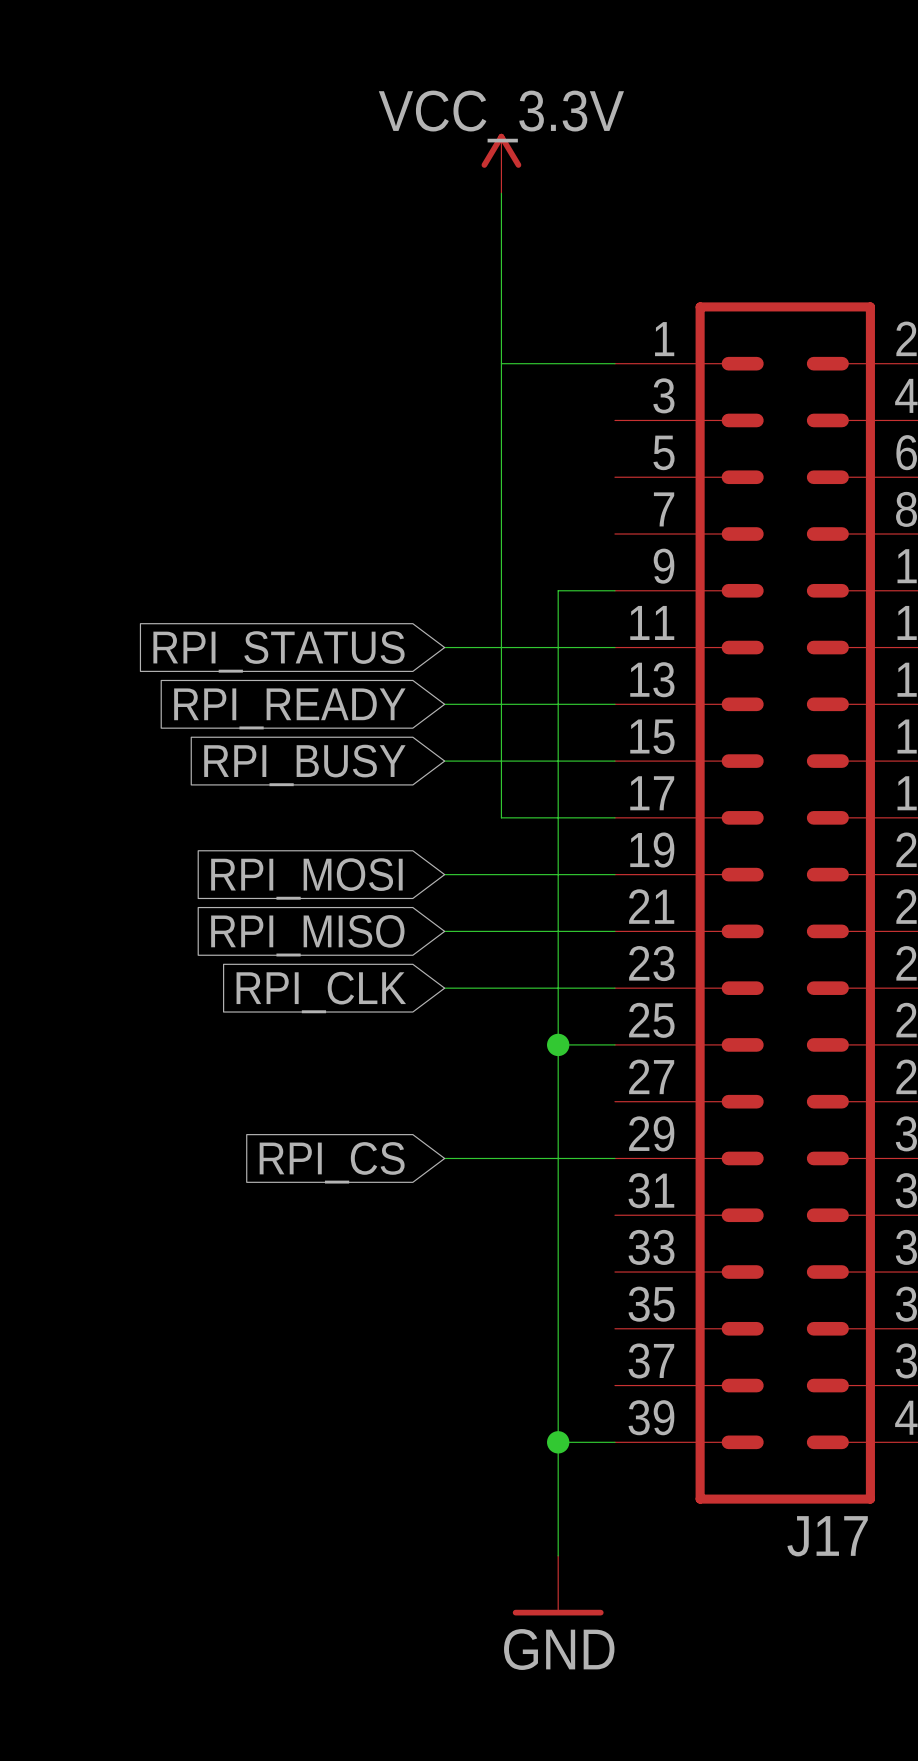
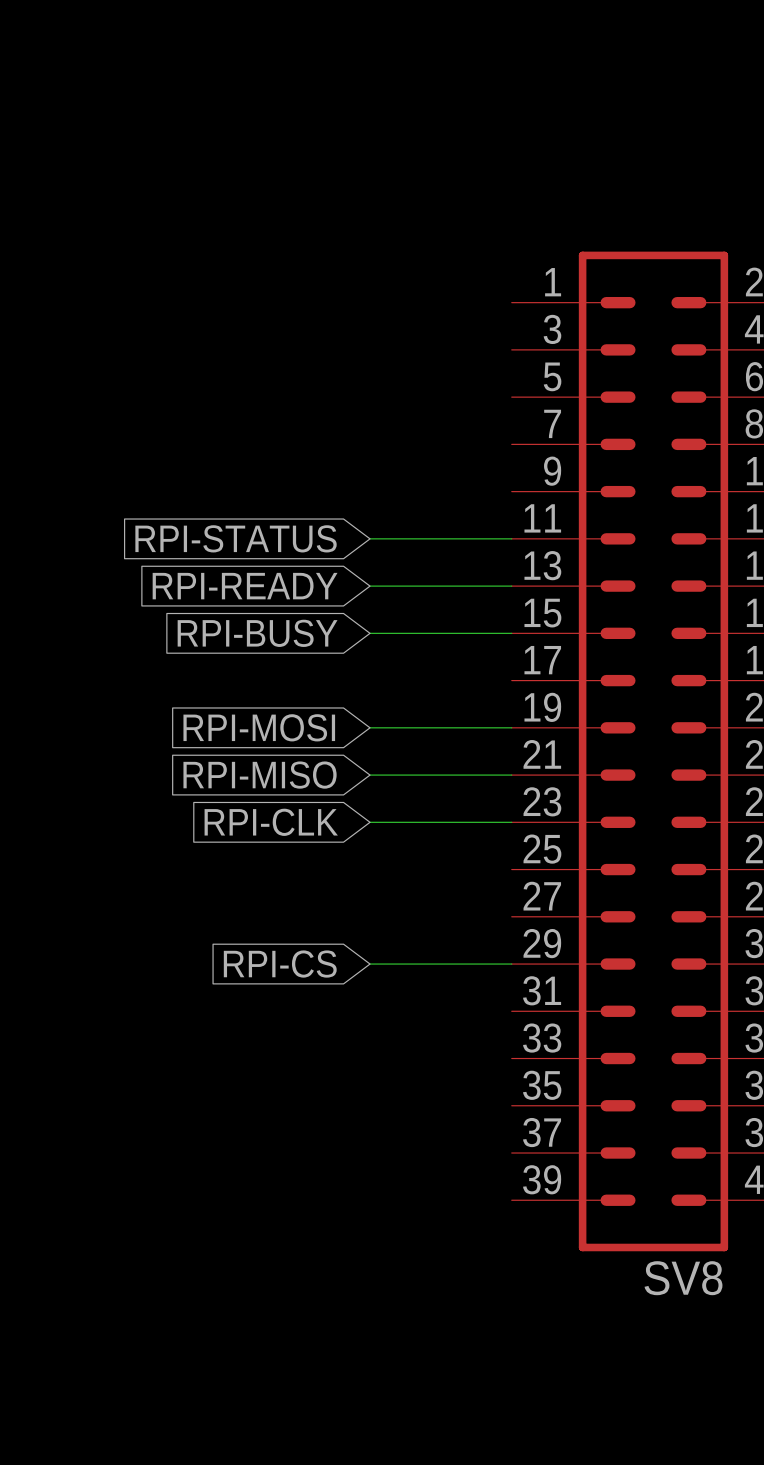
power symbol: VCC_3.3V (501, 163) -> none
wire: (501, 193) (501, 817) (614, 817) -> none
wire: (501, 363) (614, 363) -> none
wire: (614, 590) (558, 590) (558, 1555) -> none
global label: RPI_STATUS (278, 651) -> RPI-STATUS (236, 538)
global label: RPI_READY (289, 708) -> RPI-READY (245, 586)
global label: RPI_BUSY (304, 765) -> RPI-BUSY (257, 633)
global label: RPI_MOSI (306, 878) -> RPI-MOSI (259, 727)
global label: RPI_MISO (307, 935) -> RPI-MISO (260, 775)
global label: RPI_CLK (321, 992) -> RPI-CLK (271, 822)
wire: (558, 1044) (614, 1044) -> none
junction: (558, 1044) -> none
global label: RPI_CS (332, 1162) -> RPI-CS (280, 964)
wire: (558, 1442) (614, 1442) -> none
junction: (558, 1442) -> none
J17 name: J17 (827, 1536) -> SV8 (683, 1278)
power symbol: GND (558, 1585) -> none

